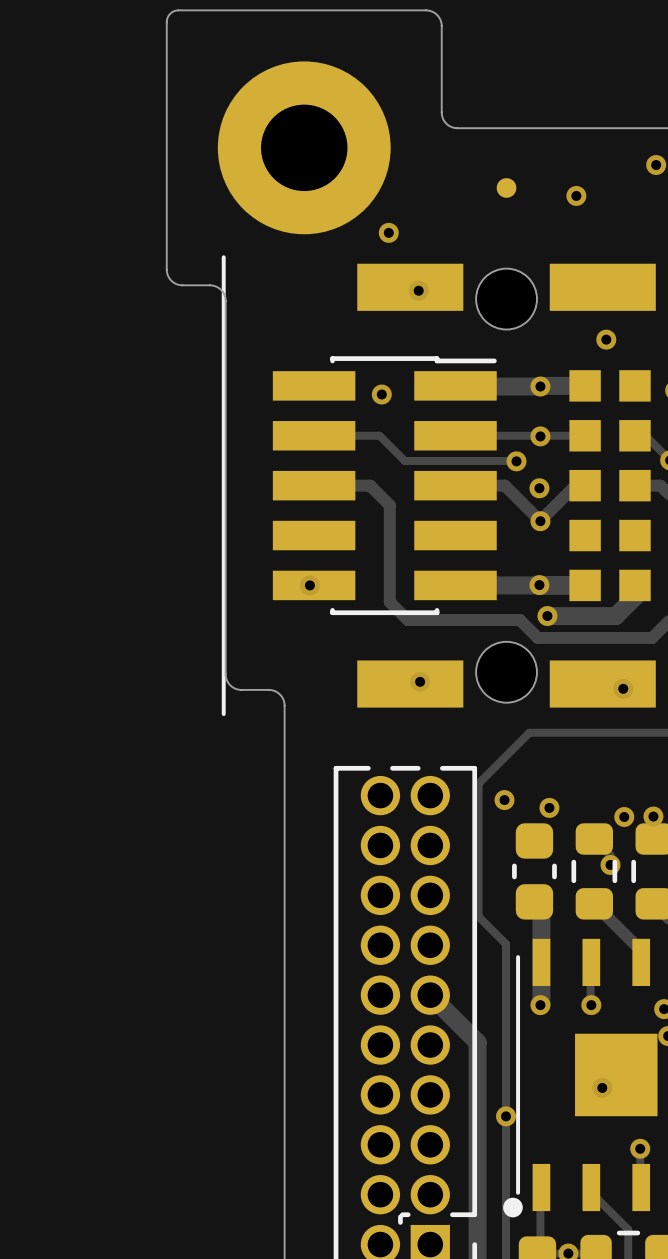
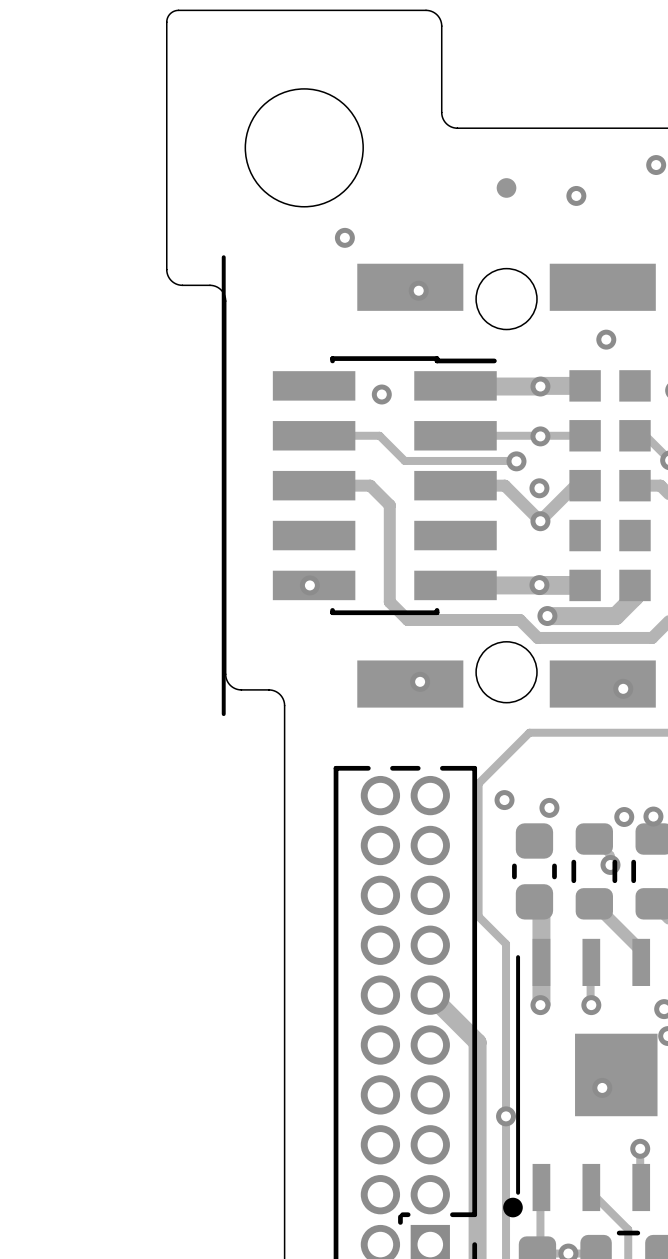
round board edge: none -> [244, 88, 364, 208]
part: (304, 147) -> none
via position: (388, 232) -> (344, 237)

